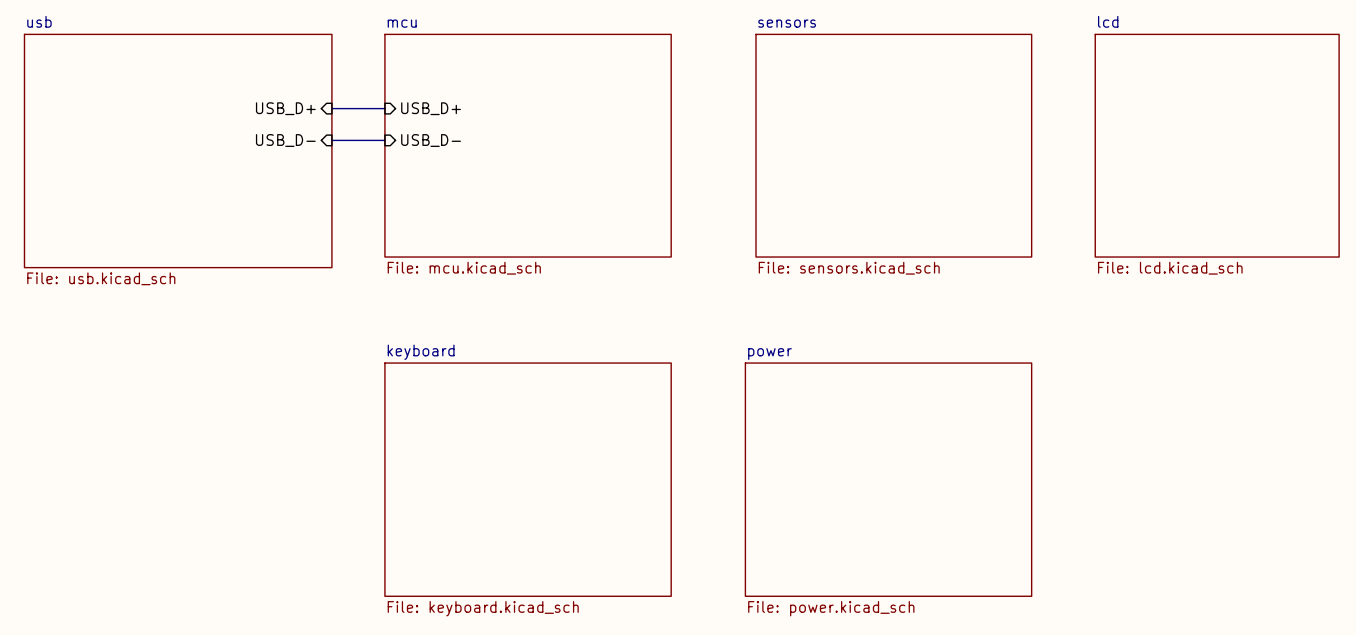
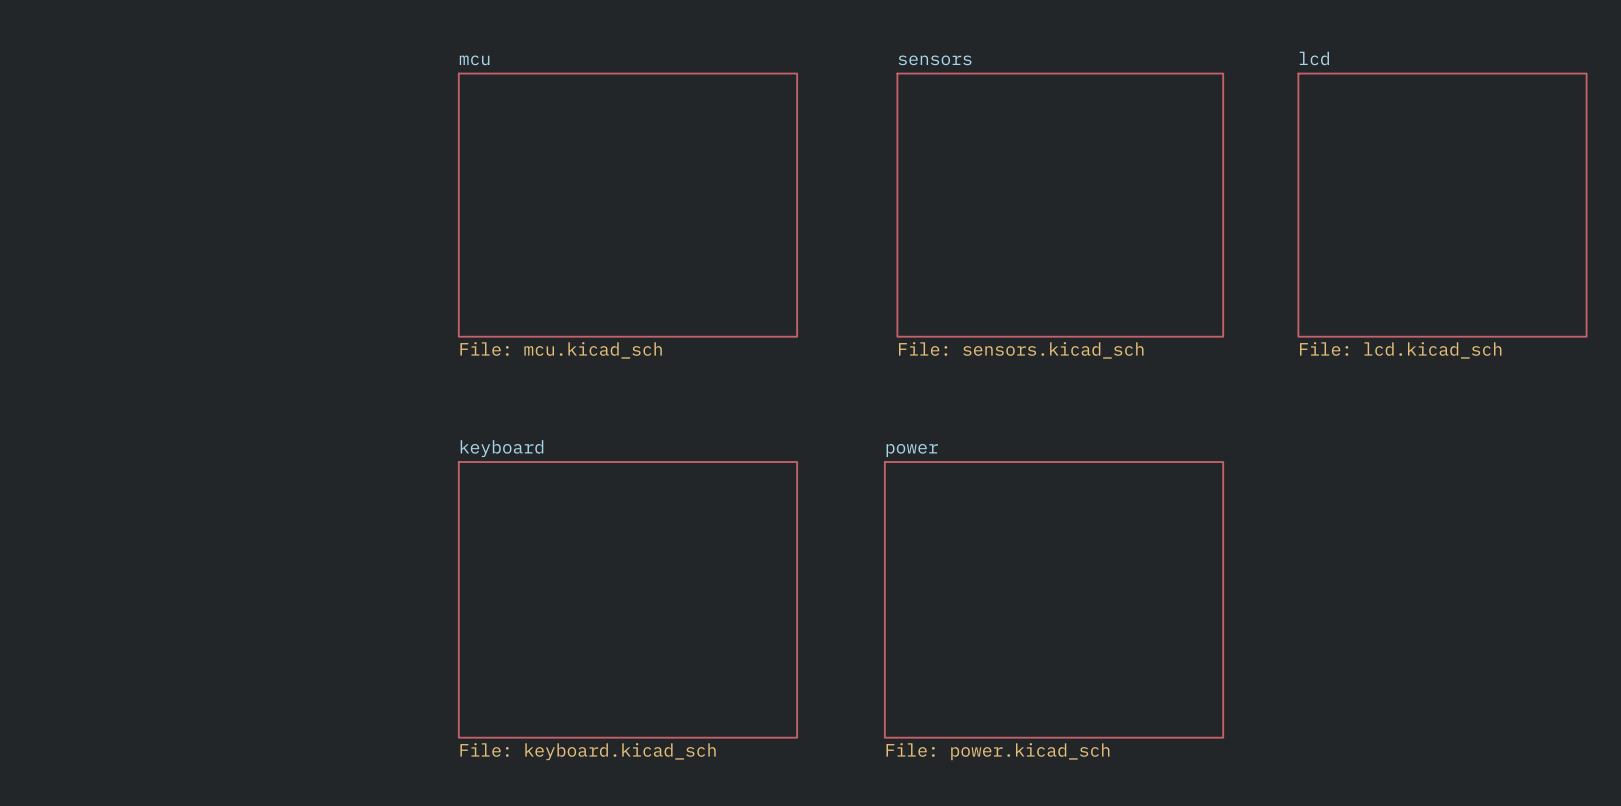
sheet pin: USB_D+ (285, 108) -> none
wire: (331, 108) (384, 108) -> none
sheet pin: USB_D+ (431, 108) -> none
sheet pin: USB_D- (285, 140) -> none
wire: (331, 140) (384, 140) -> none
sheet pin: USB_D- (431, 140) -> none
sheet usb: File: usb.kicad_sch (178, 151) -> none

